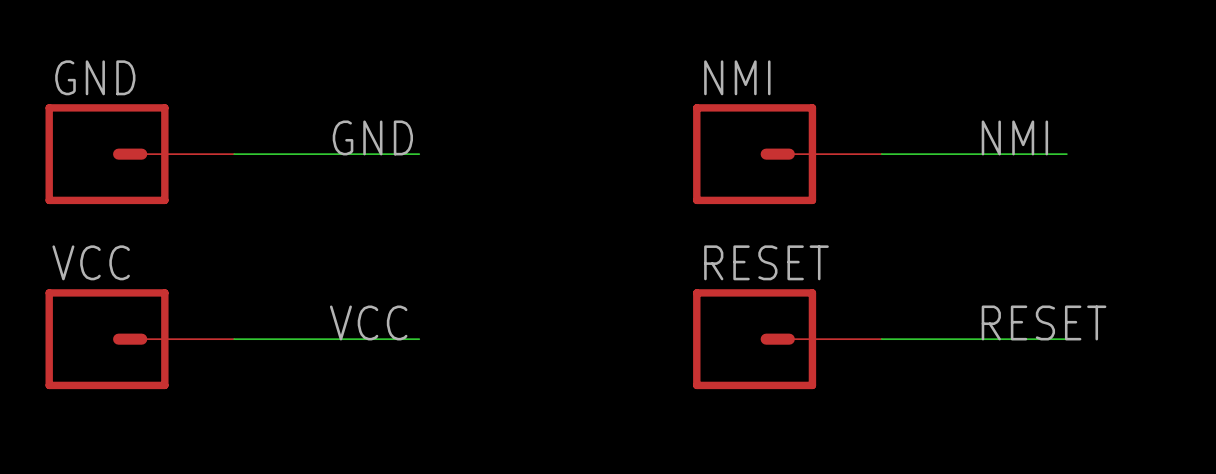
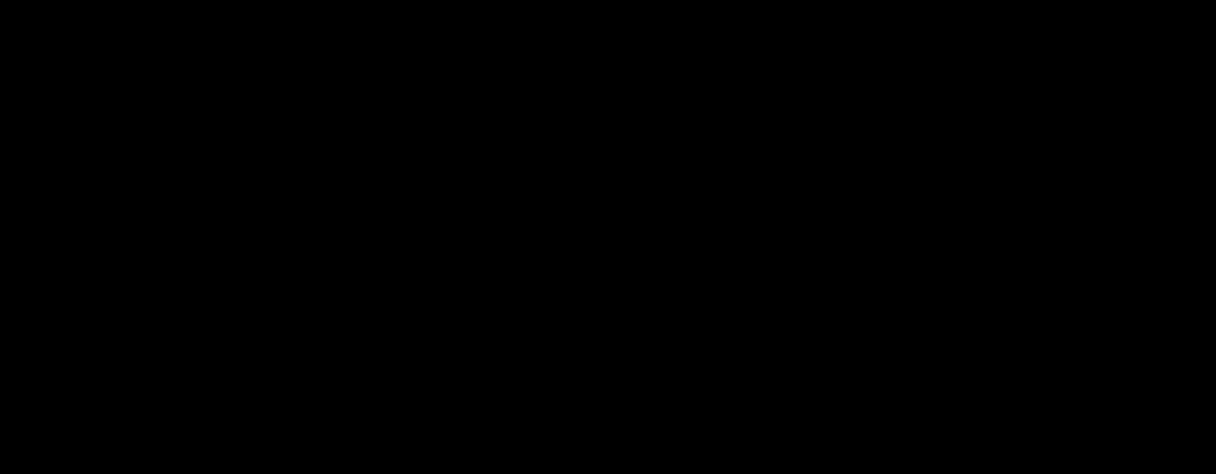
label: GND (372, 137) -> none
label: NMI (1014, 137) -> none
GND: (139, 154) -> none
wire: (234, 154) (419, 154) -> none
NMI: (787, 154) -> none
wire: (881, 154) (1066, 154) -> none
label: VCC (368, 322) -> none
label: RESET (1044, 322) -> none
VCC: (139, 339) -> none
wire: (234, 339) (419, 339) -> none
RESET: (787, 339) -> none
wire: (881, 339) (1066, 339) -> none

